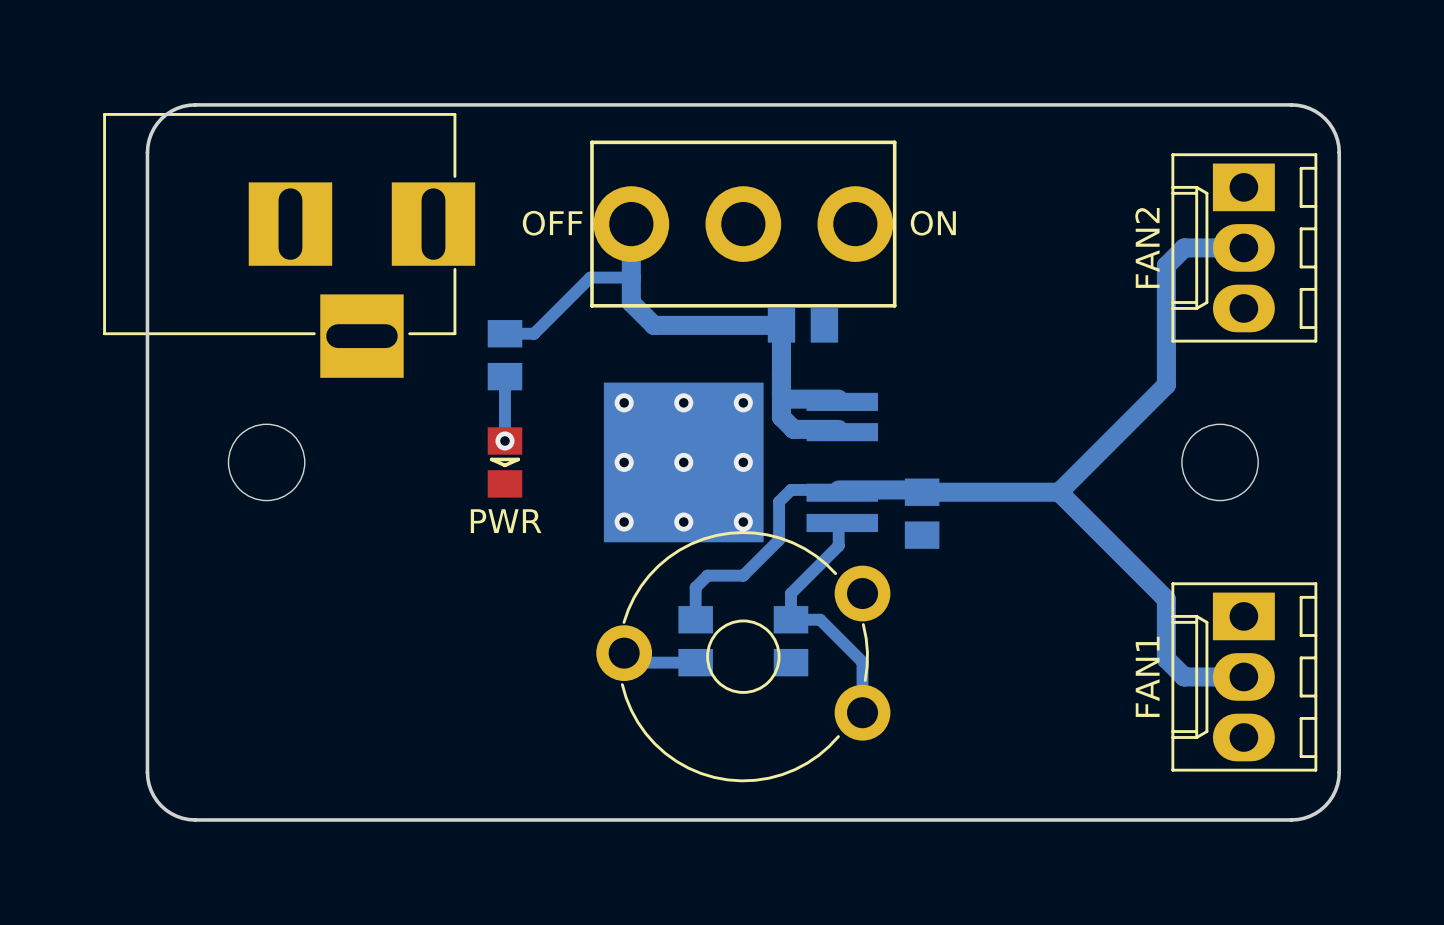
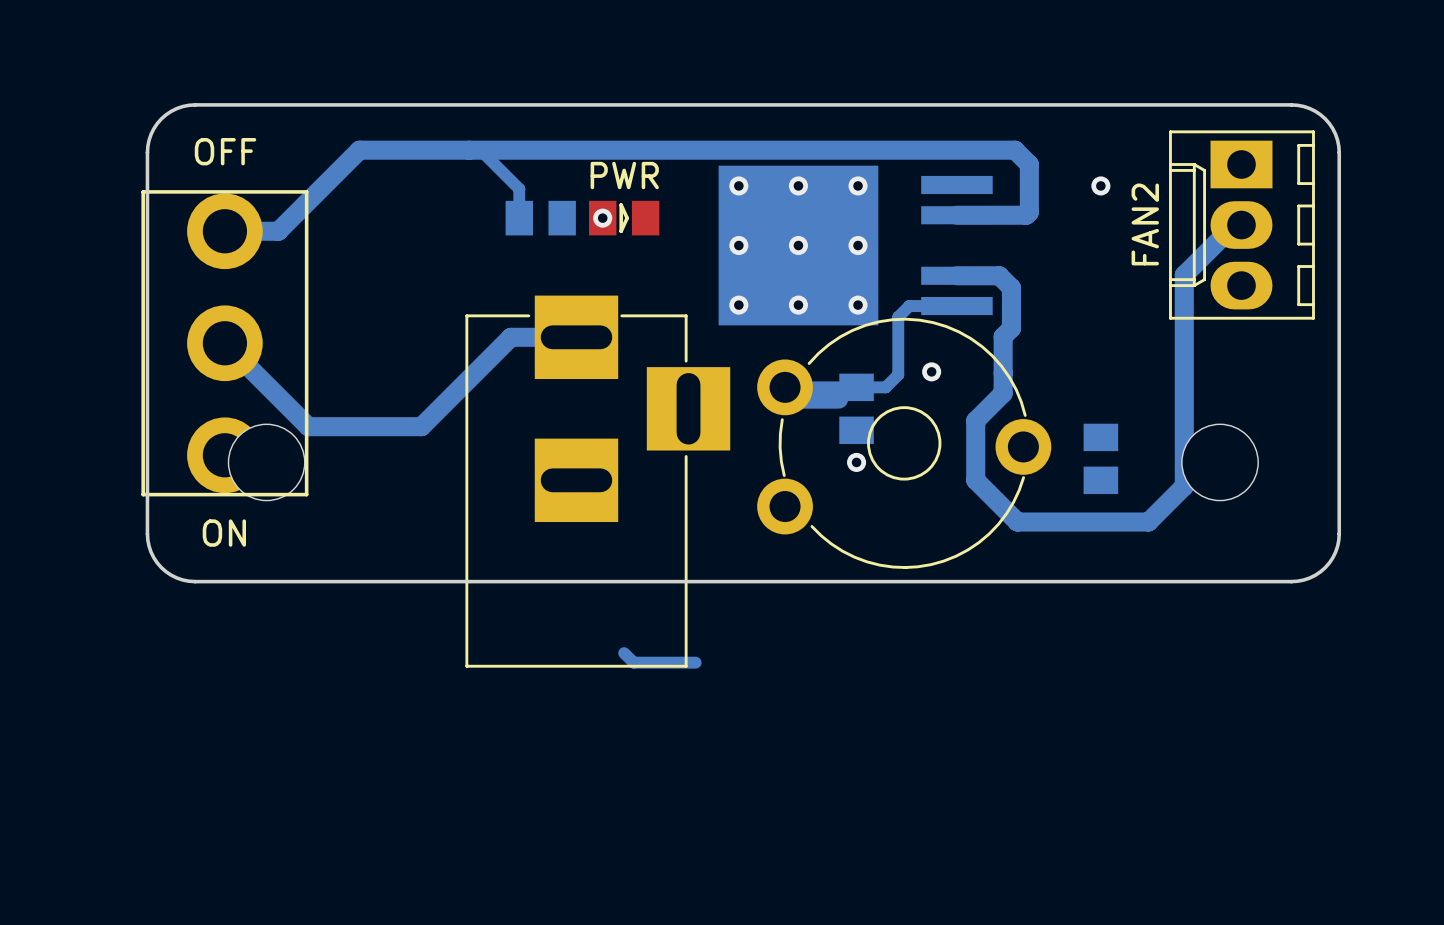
bottom track: none -> (469, 150) (480, 150) (519, 188) (519, 218)
via: none -> (738, 185)
via: none -> (798, 185)
via: none -> (858, 185)
via: none -> (1100, 185)
bottom track: none -> (956, 215) (1026, 215) (1029, 212) (1029, 164) (1015, 150) (359, 150) (278, 231) (224, 231)
part: none -> (540, 218)
via: none -> (602, 218)
bottom track: (631, 224) (631, 302) (653, 325) (781, 325) (781, 417) (793, 429) (838, 429) -> none
ON rotation: 0° (743, 224) -> 90° clockwise (224, 343)
ON position: (743, 224) -> (224, 343)
bottom track: none -> (1241, 225) (1234, 225) (1184, 275) (1184, 486) (1148, 522) (1017, 522) (975, 480) (975, 420) (1003, 393) (1003, 336) (1011, 328) (1011, 287) (999, 275) (956, 275)
part rotation: 0° (289, 245) -> 90° counterclockwise (597, 481)
part position: (289, 245) -> (597, 481)
via: none -> (738, 245)
via: none -> (798, 245)
via: none -> (858, 245)
bottom track: (1243, 247) (1184, 247) (1166, 265) (1166, 384) (1059, 492) -> none
part position: (1244, 247) -> (1241, 225)
bottom track: (631, 277) (590, 277) (534, 333) (504, 333) -> none
via: none -> (738, 305)
via: none -> (798, 305)
via: none -> (858, 305)
bottom track: none -> (956, 306) (909, 306) (898, 317) (898, 374) (885, 387) (785, 387)
part: (802, 325) -> none
bottom track: none -> (576, 337) (510, 337) (421, 426) (308, 426) (224, 343)
part: (504, 355) -> none
via: none -> (931, 371)
bottom track: (504, 376) (504, 440) -> none
via: (624, 402) -> none
via: (683, 402) -> none
via: (743, 402) -> none
part: none -> (856, 408)
via: (504, 440) -> none
part: none -> (1100, 458)
PWR rotation: 0° (504, 462) -> 90° counterclockwise (624, 218)
PWR position: (504, 462) -> (624, 218)
via: (624, 462) -> none
via: (683, 462) -> none
part position: (740, 462) -> (855, 245)
via: (743, 462) -> none
via: none -> (856, 462)
bottom track: (1059, 492) (1166, 599) (1166, 659) (1184, 676) (1243, 676) -> none
bottom track: (1059, 492) (791, 489) (779, 501) (779, 539) (743, 575) (707, 575) (695, 587) (695, 619) -> none
part: (922, 513) -> none
bottom track: (838, 520) (838, 545) (791, 593) (791, 619) (820, 619) (862, 662) (862, 712) -> none
PWR name position: PWR (506, 521) -> PWR (624, 175)
via: (624, 522) -> none
via: (683, 522) -> none
via: (743, 522) -> none
board edge: (147, 533) (147, 778) (151, 790) (161, 806) (176, 816) (195, 819) (1291, 819) (1303, 818) (1315, 813) (1329, 801) (1335, 790) (1338, 778) (1339, 533) -> (147, 533) (151, 552) (161, 567) (176, 577) (195, 581) (1291, 581) (1309, 577) (1325, 567) (1335, 552) (1339, 533)
part: (695, 641) -> none
part: (791, 641) -> none
part rotation: 0° (743, 656) -> 180° (904, 443)
part position: (743, 656) -> (904, 443)
part: FAN1 (1244, 676) -> none

